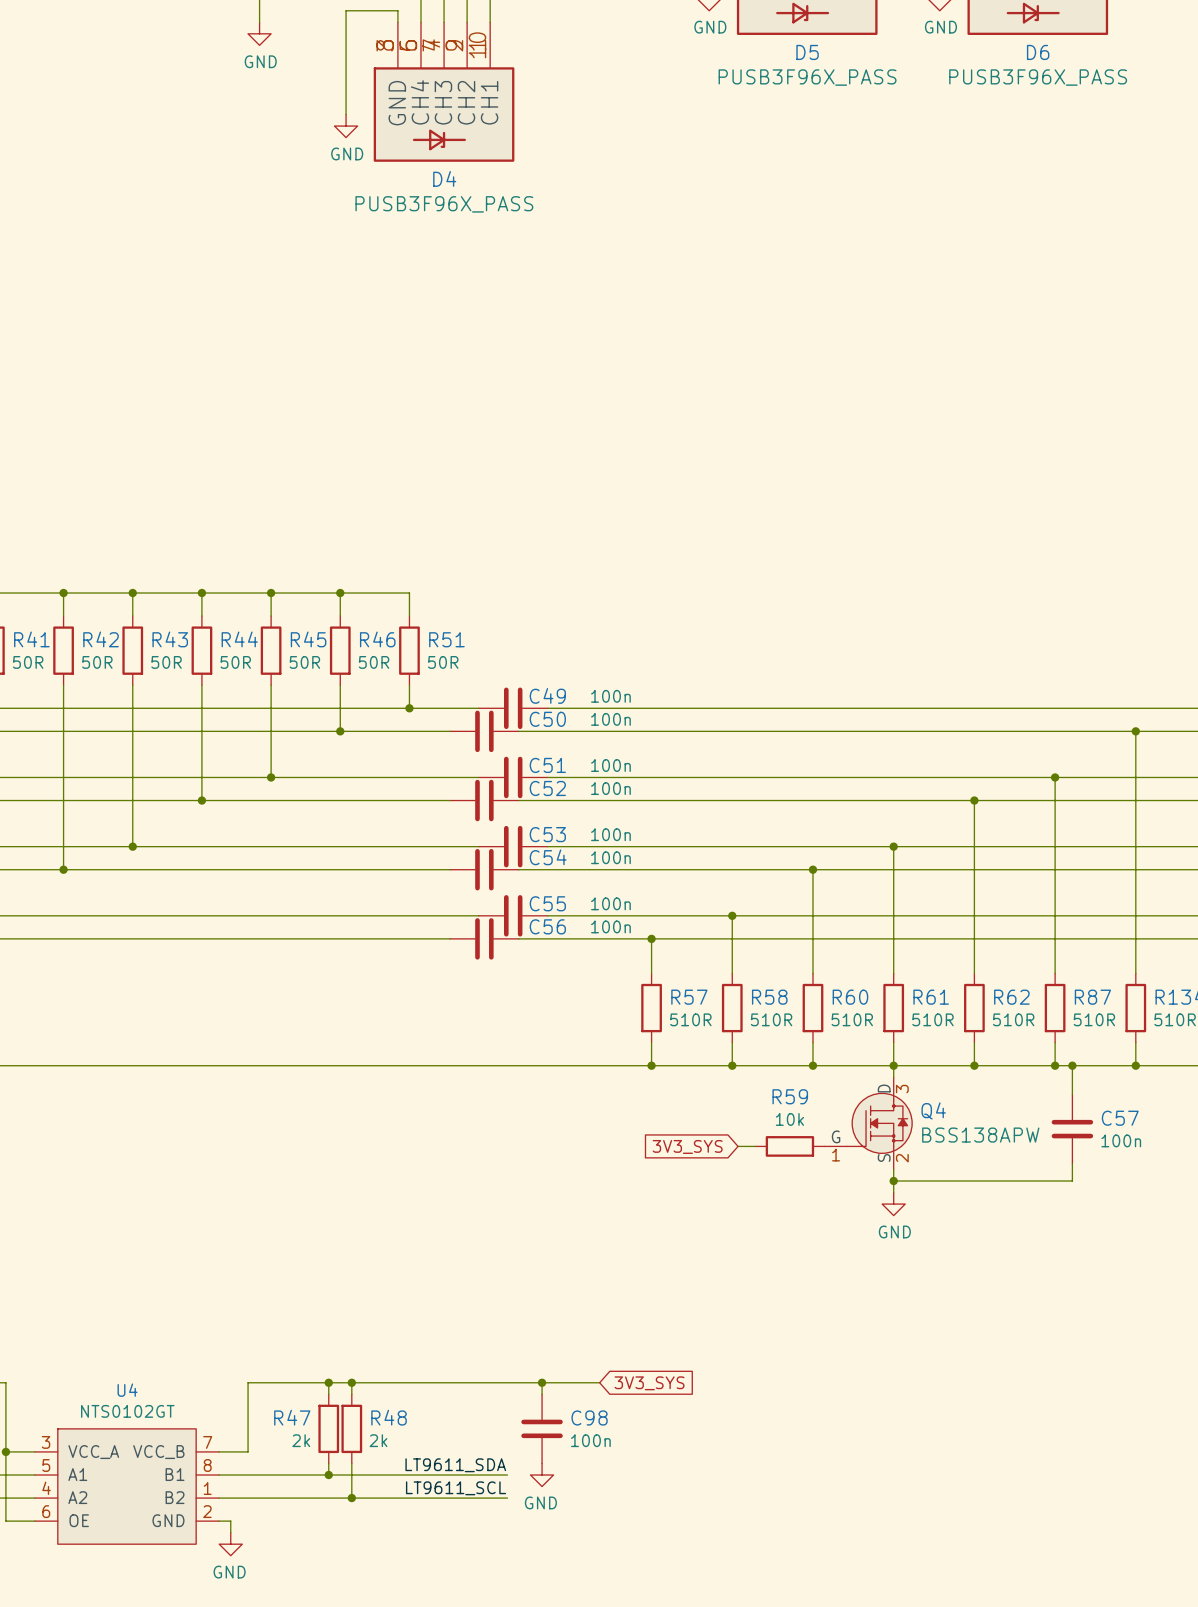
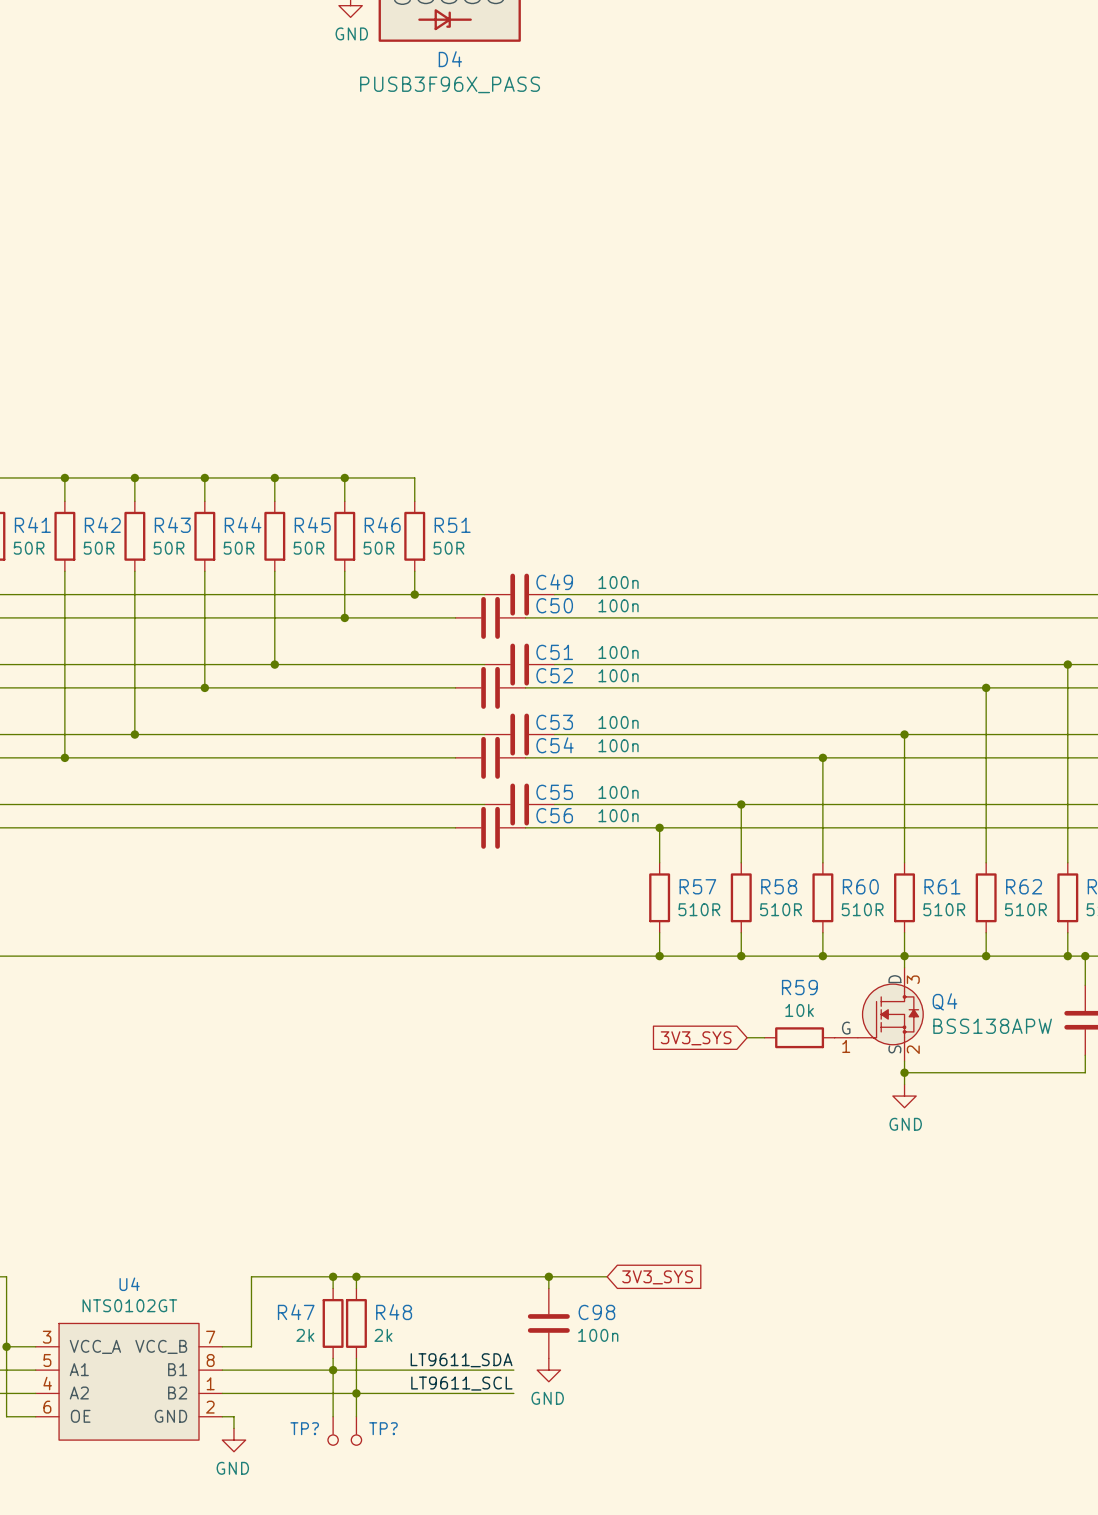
wire: none -> (333, 1370) (333, 1416)
wire: none -> (356, 1393) (356, 1416)
TP?: none -> (333, 1430)
TP?: none -> (356, 1430)

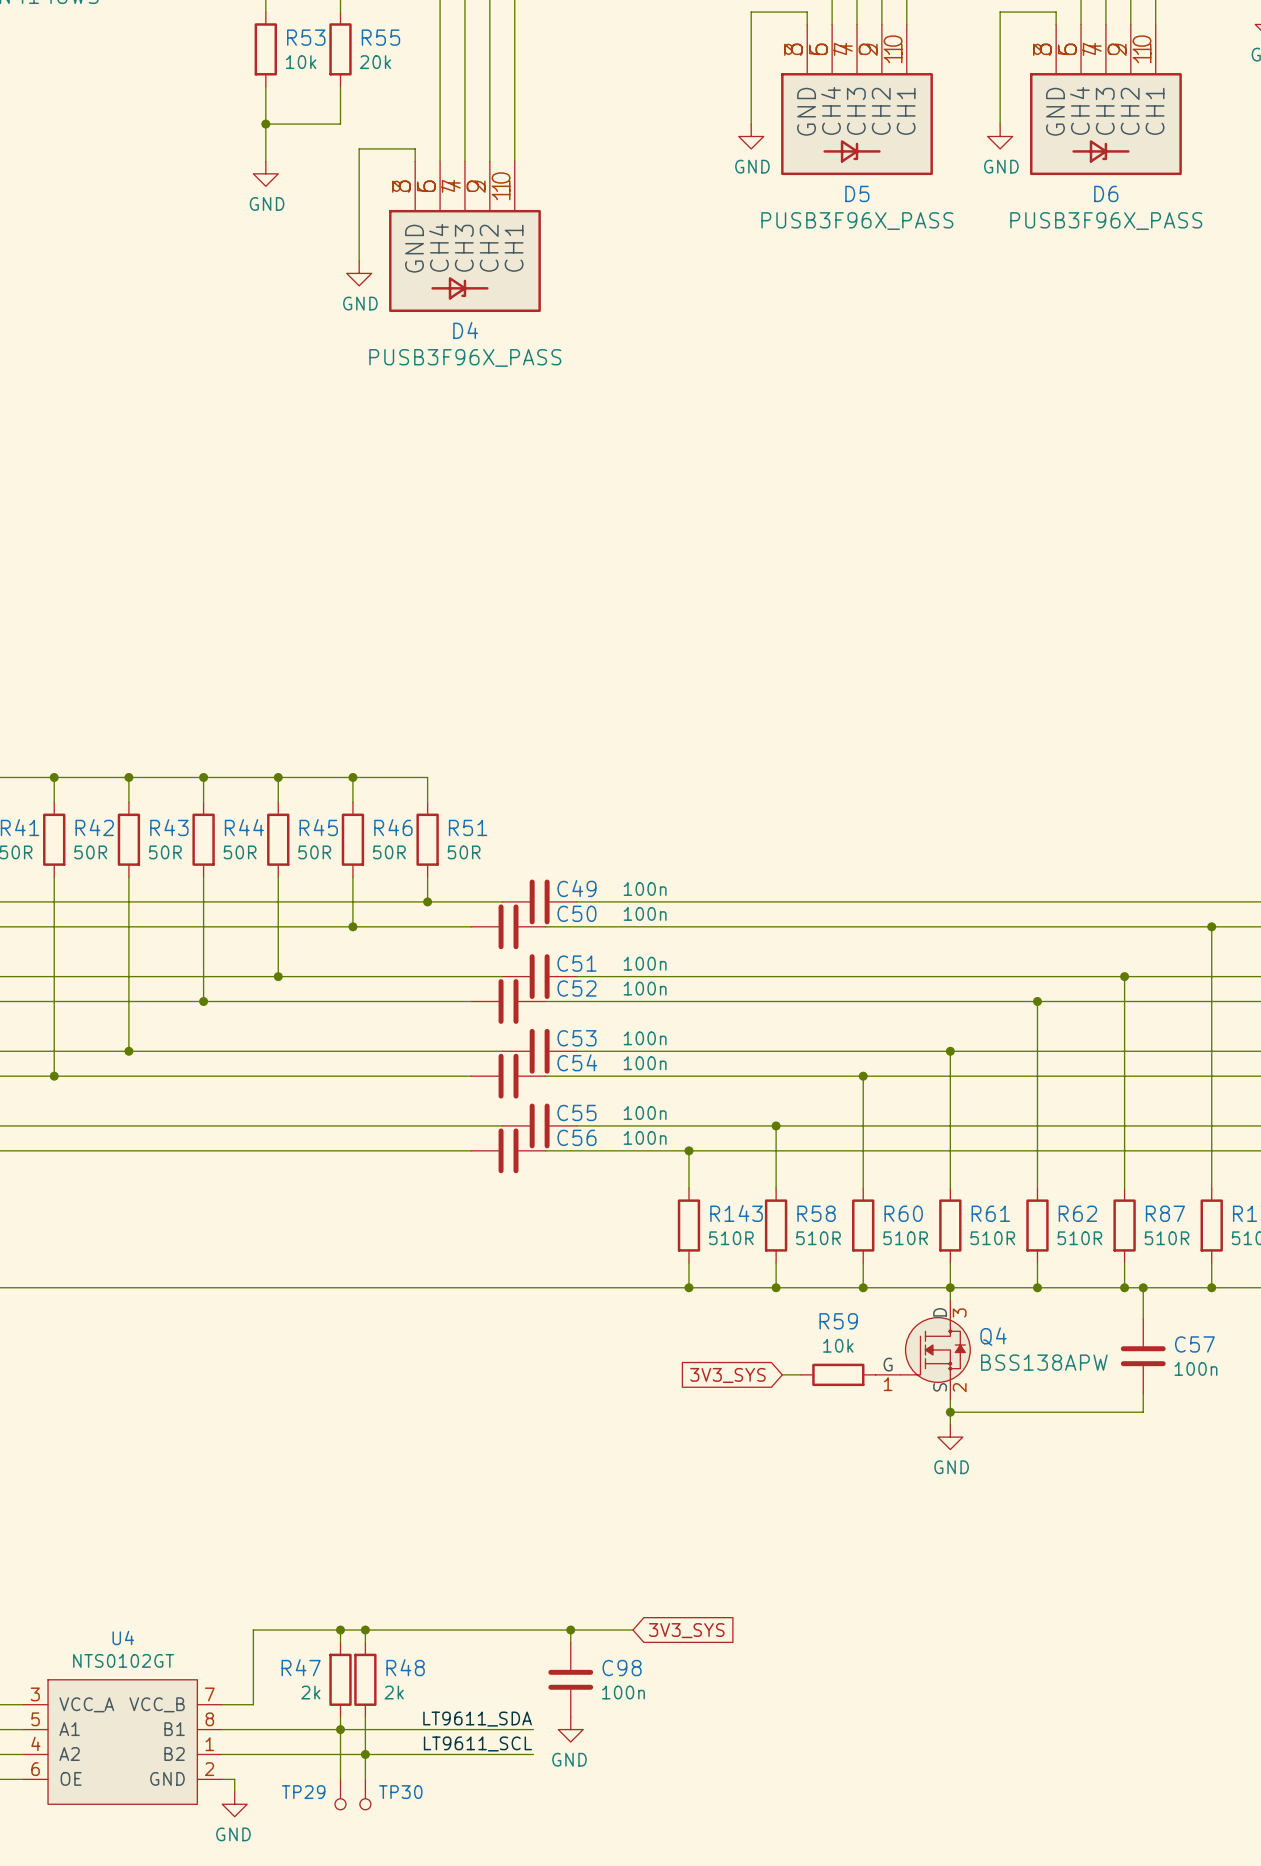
R57 name: R57 (697, 886) -> R143 (736, 1213)
TP? name: TP? (304, 1428) -> TP29 (303, 1792)
TP? name: TP? (383, 1428) -> TP30 (400, 1792)

